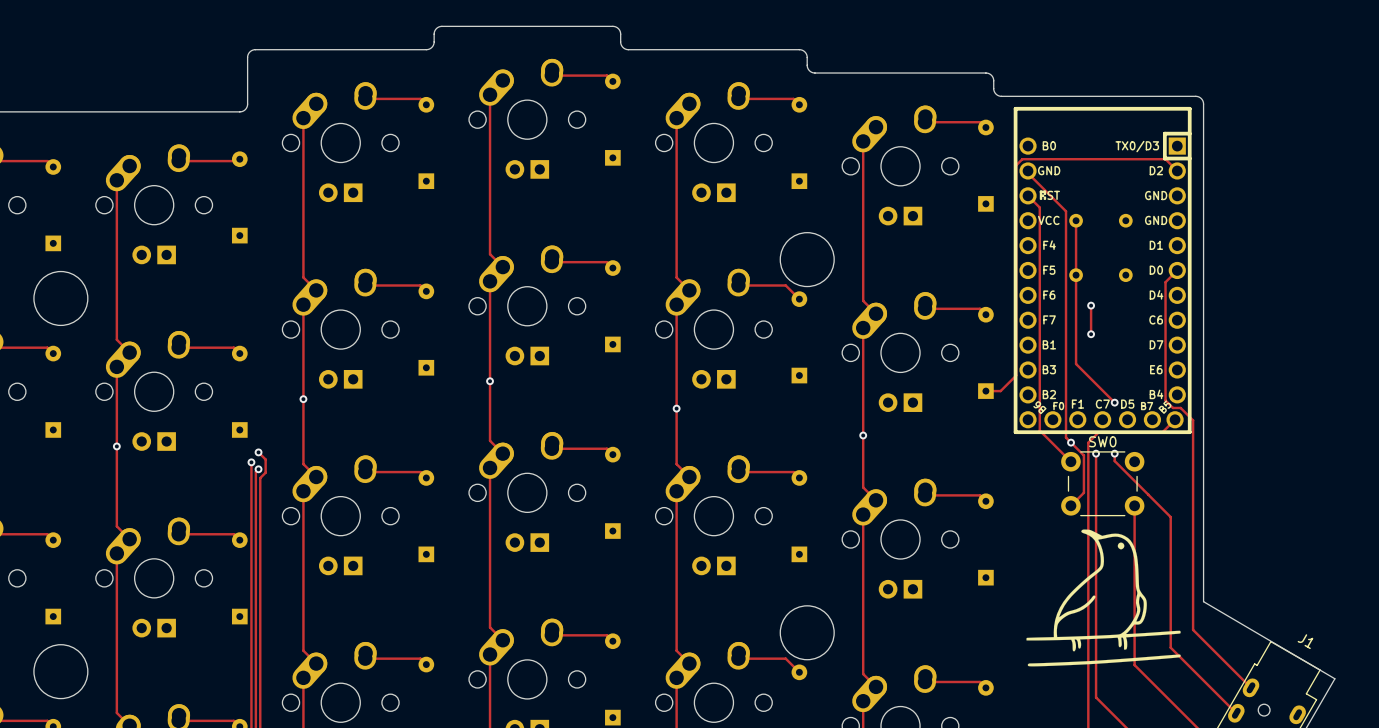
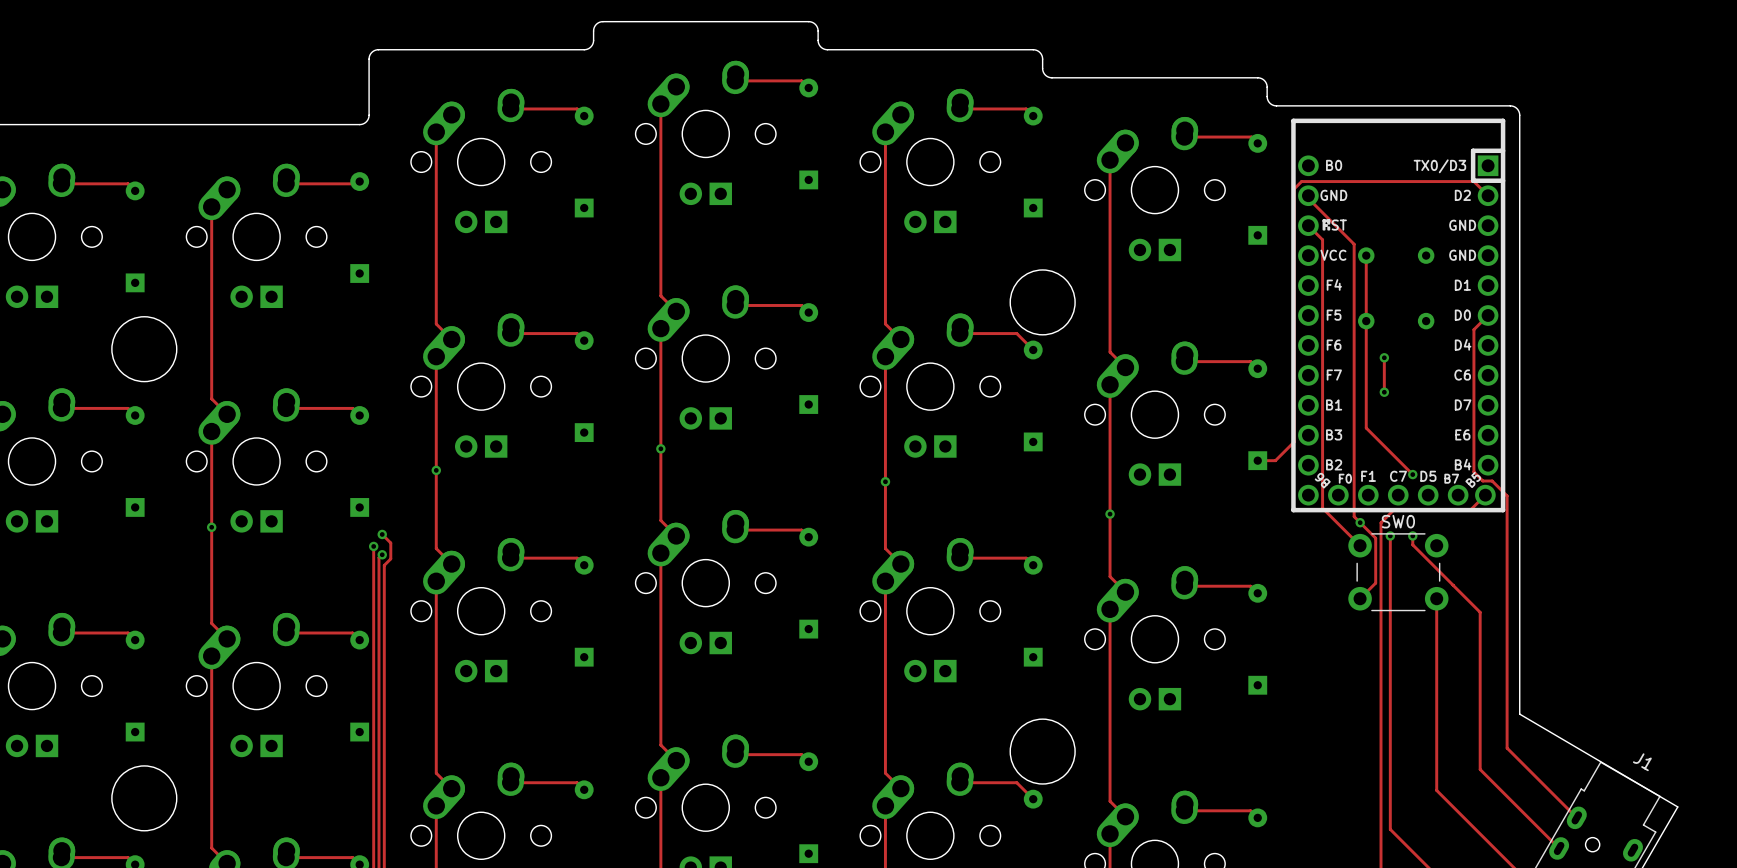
drawing: [1026, 529, 1181, 667] -> none

